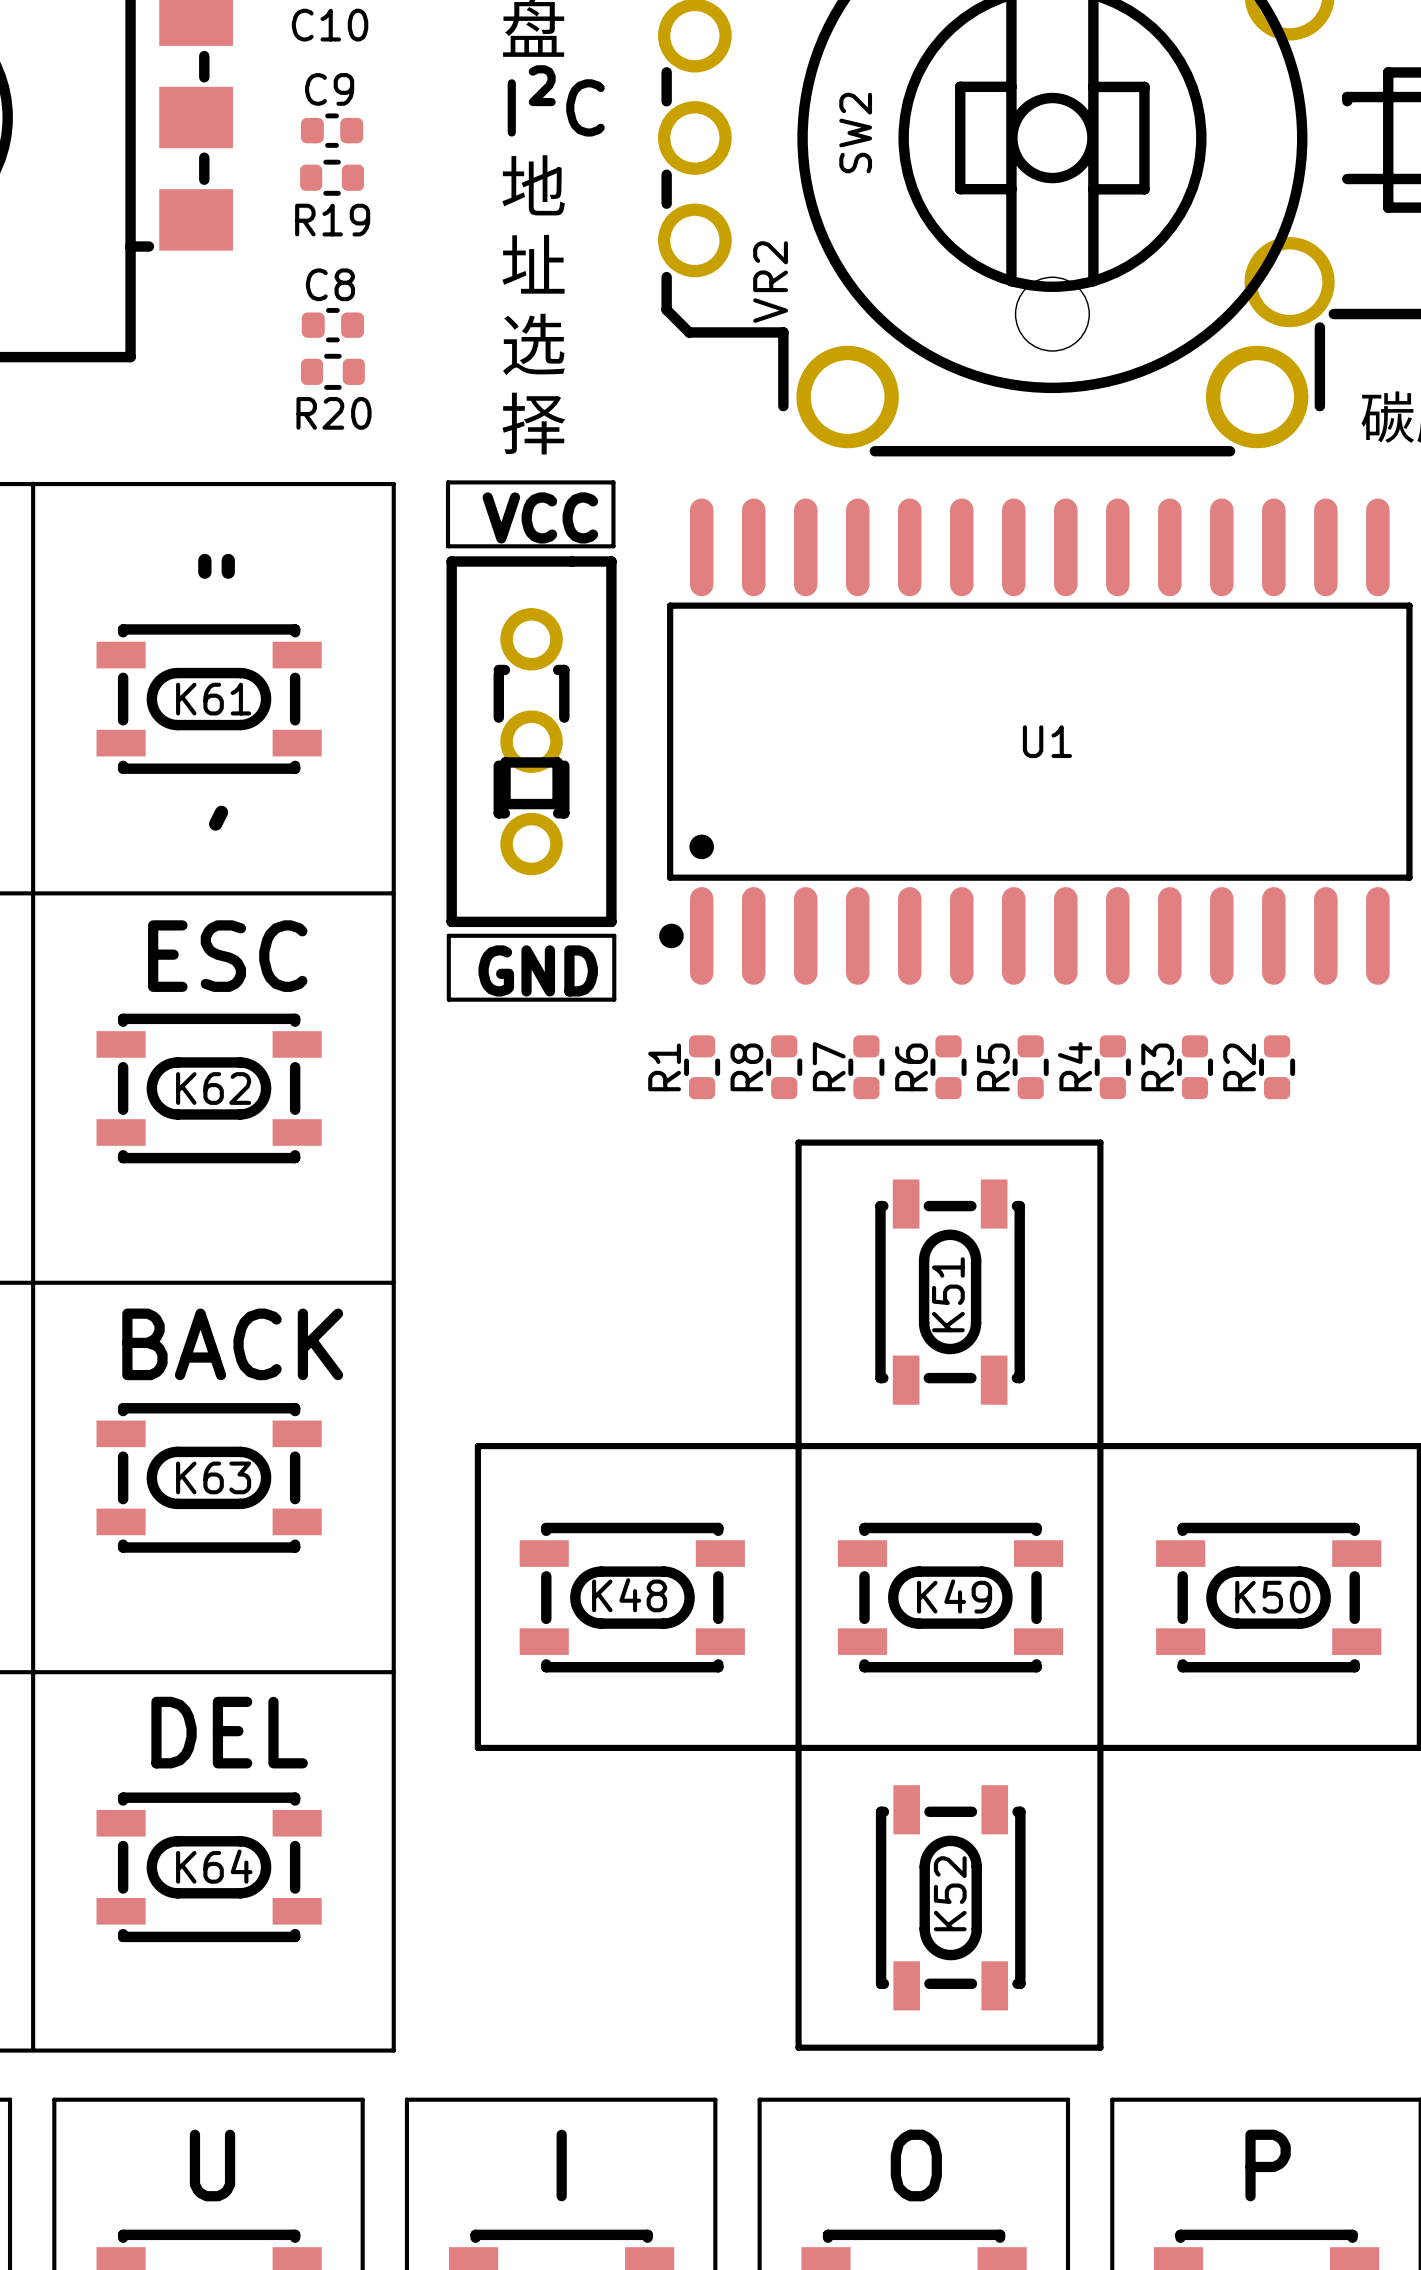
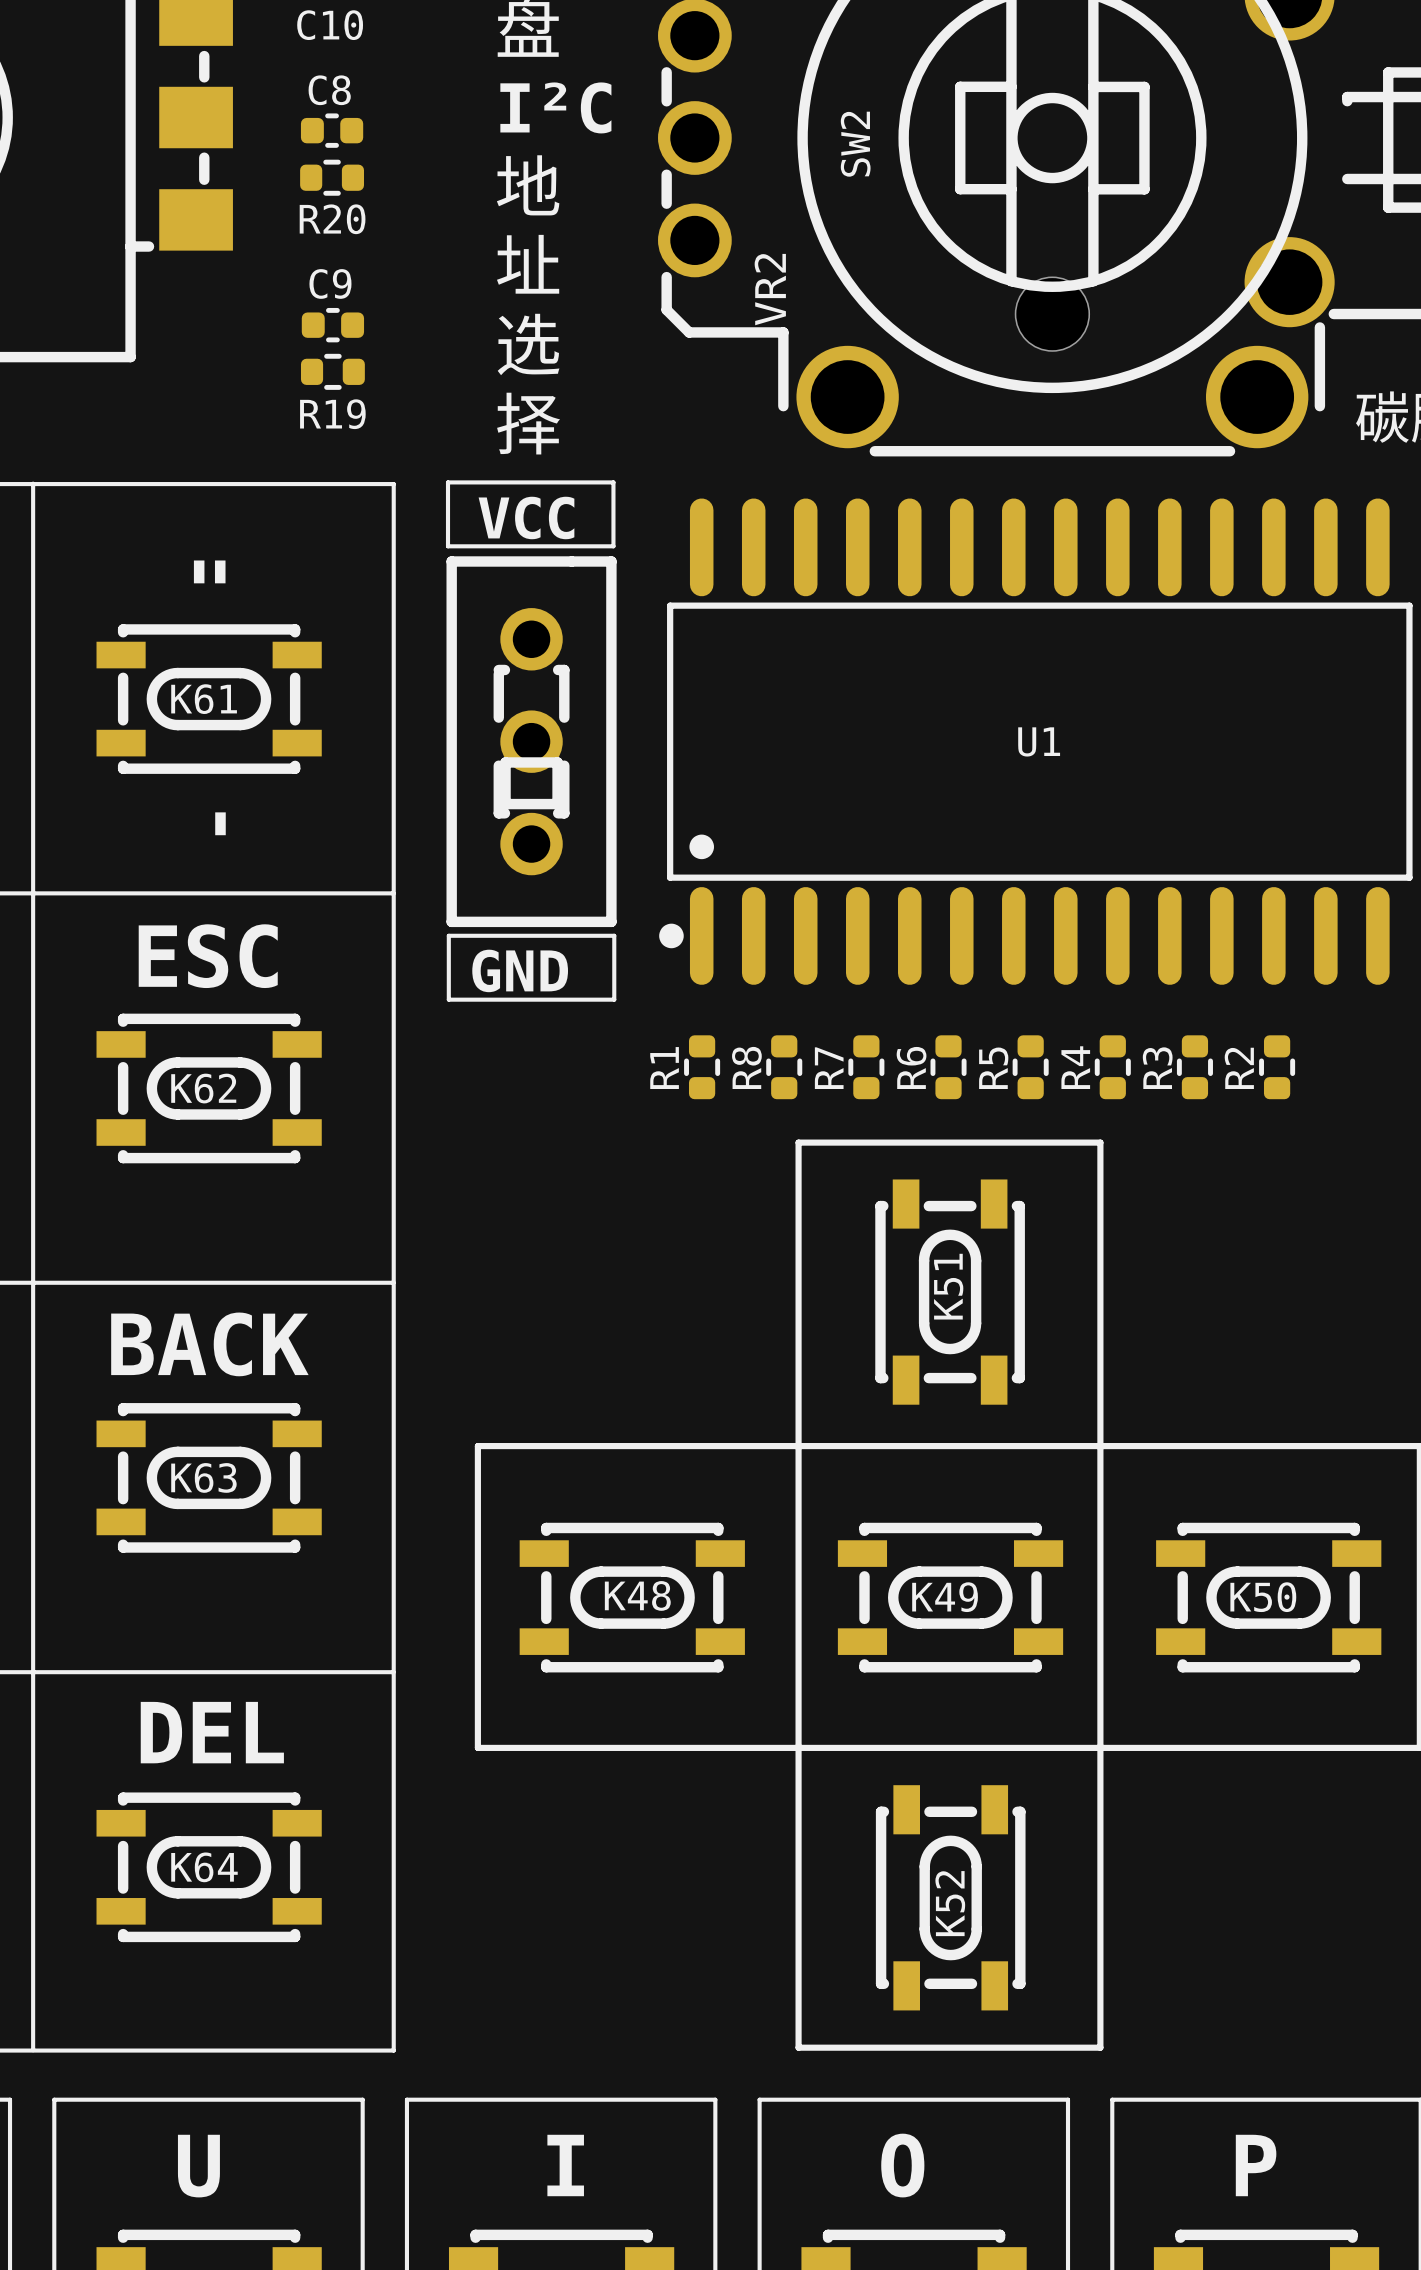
C9 name: C9 (329, 89) -> C8 (329, 90)
R19 name: R19 (332, 220) -> R20 (332, 219)
C8 name: C8 (330, 284) -> C9 (330, 283)
R20 name: R20 (334, 413) -> R19 (332, 414)

